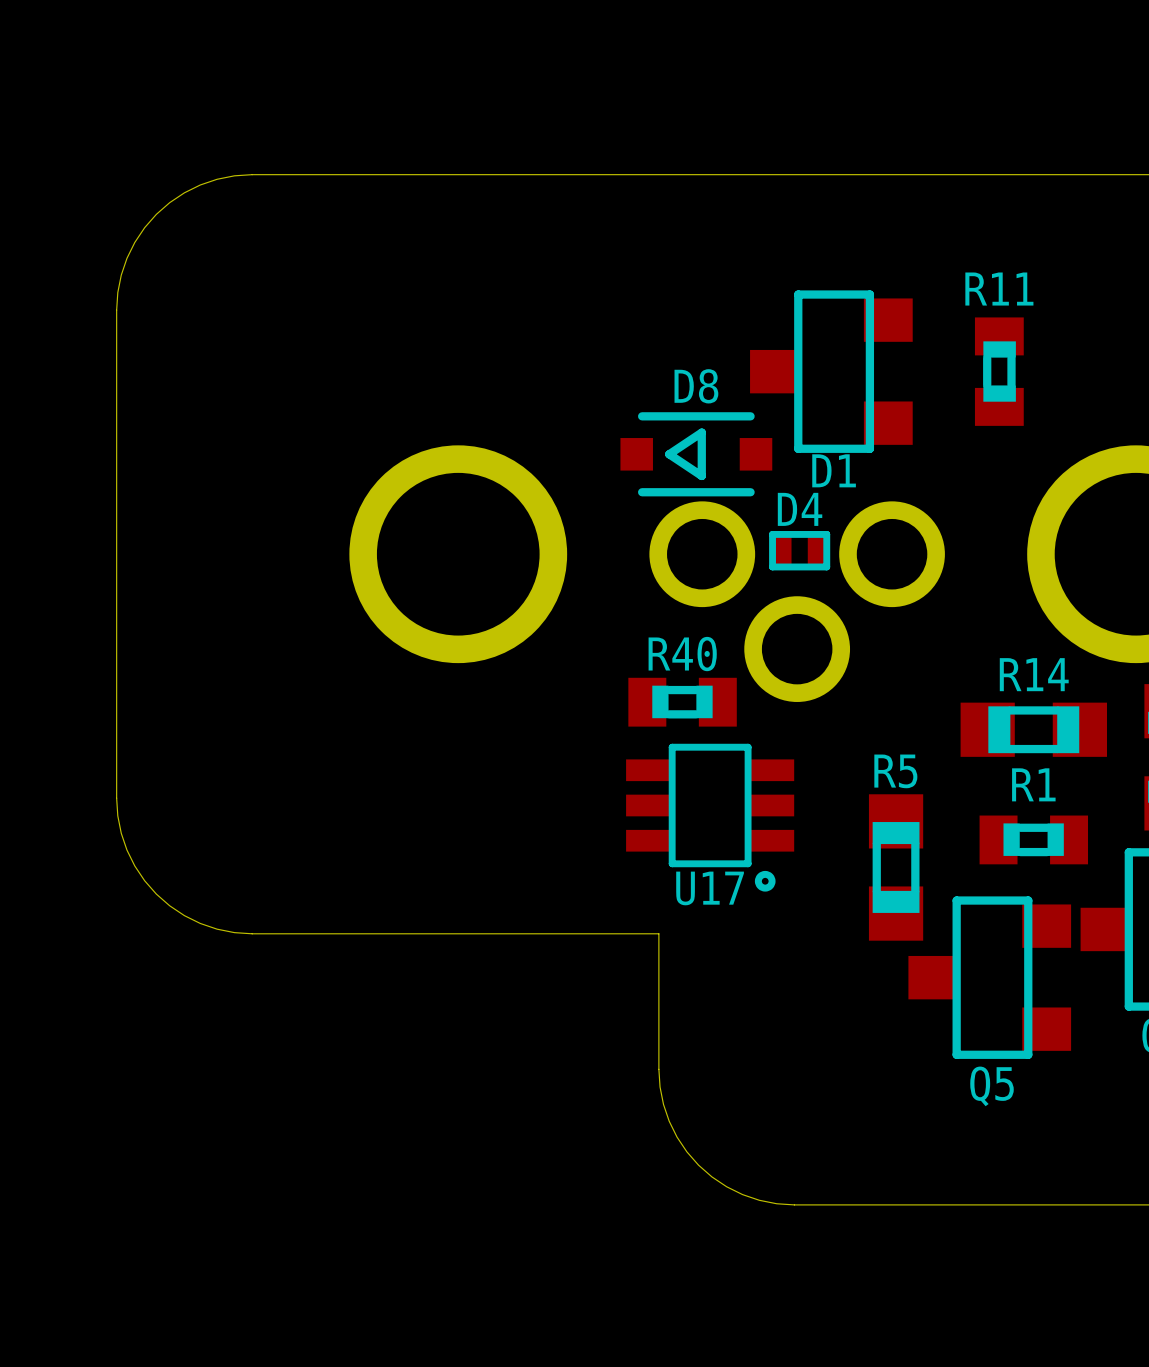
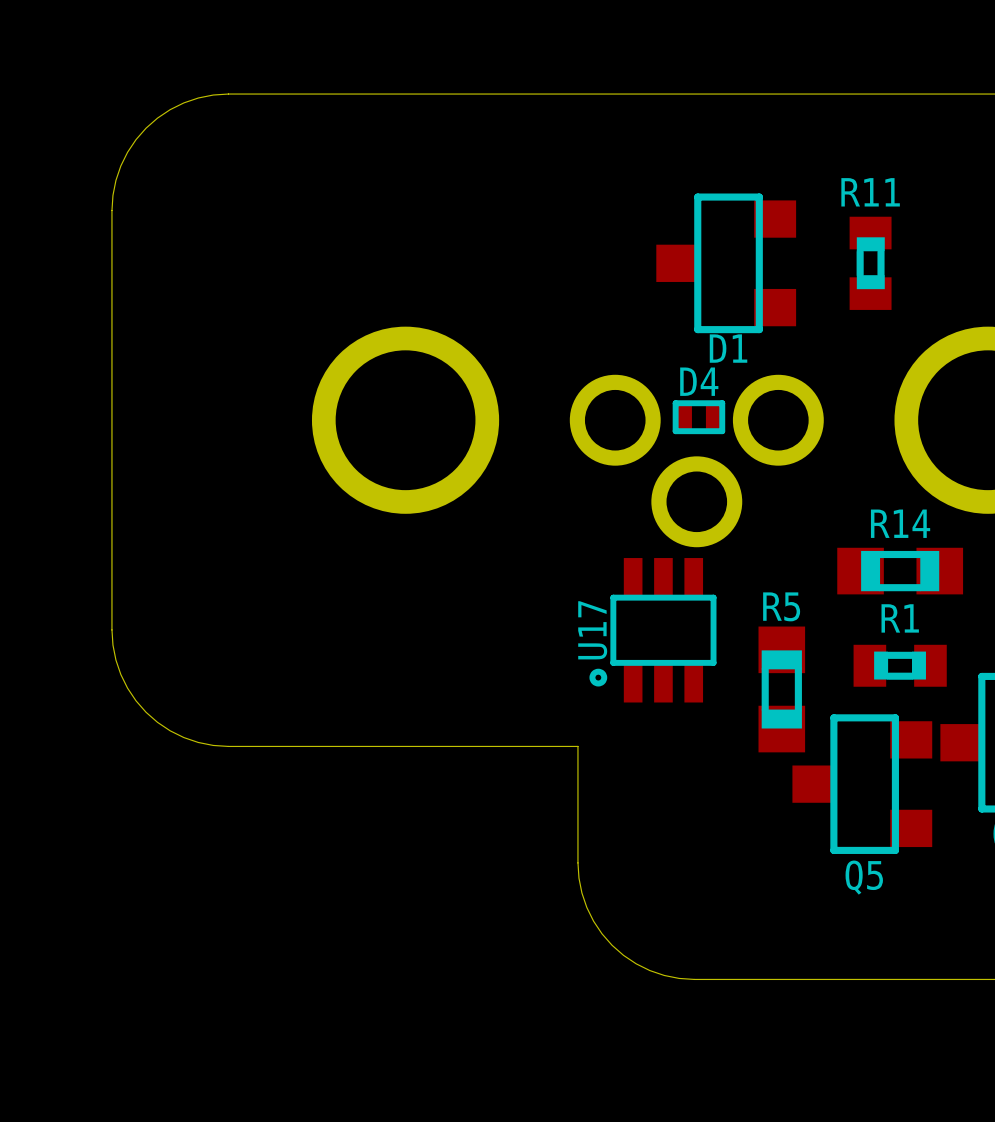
D8: (696, 454) -> none
R40: (682, 702) -> none
U17 rotation: 0° (710, 817) -> 90° clockwise (652, 630)

